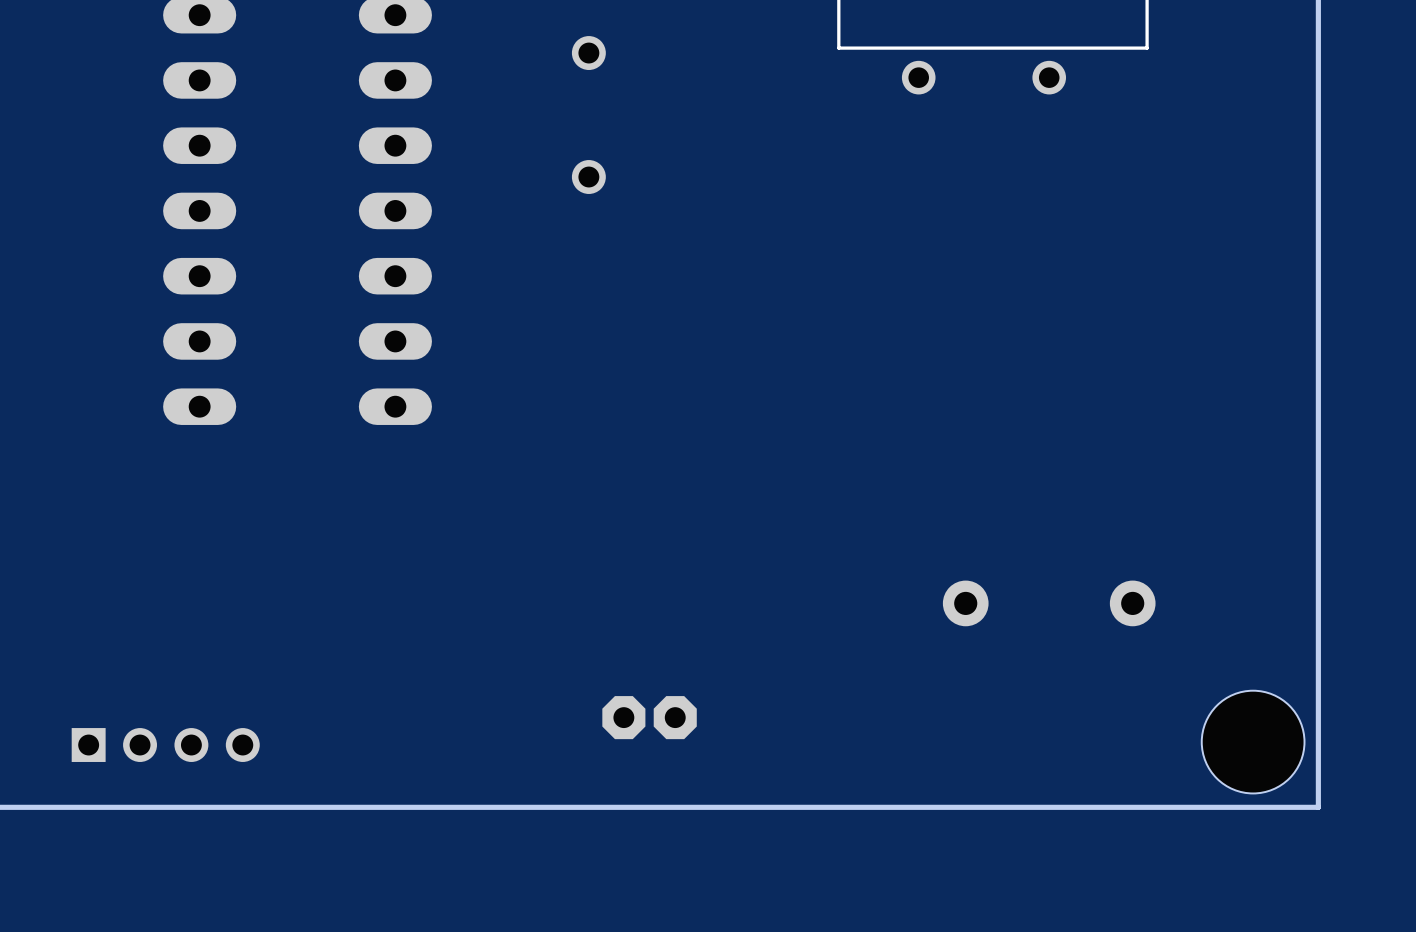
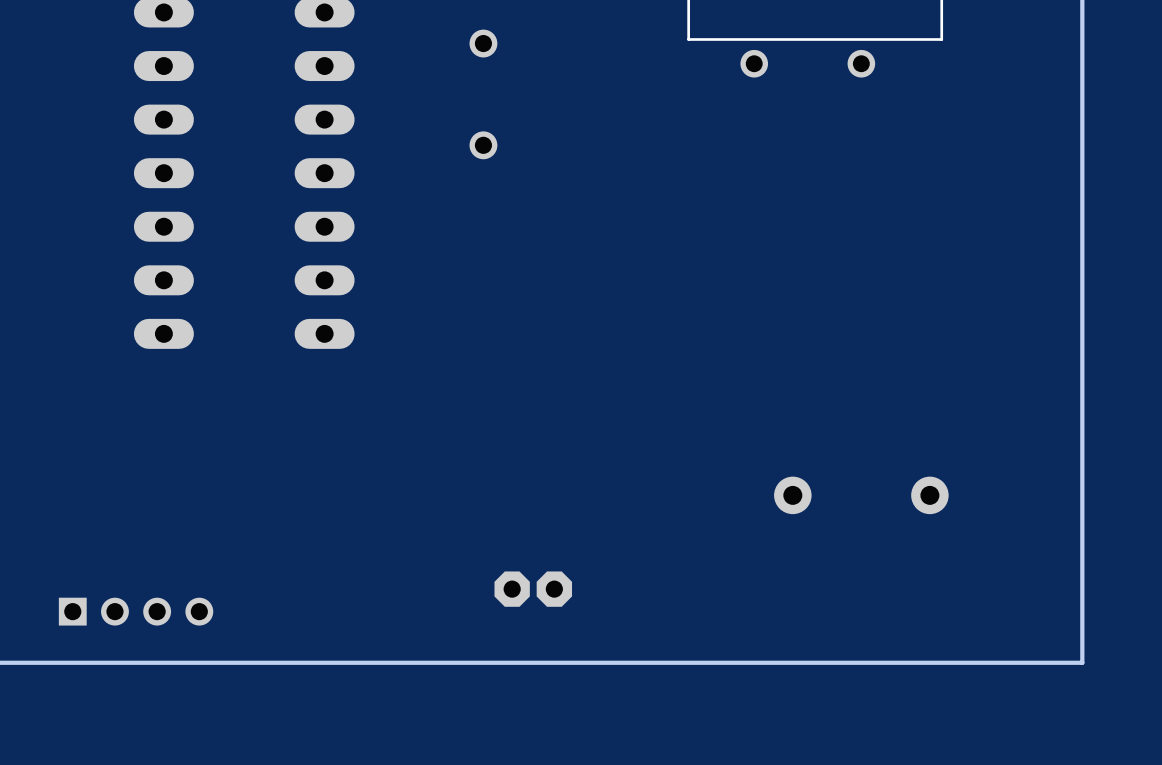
hole: (1253, 742) -> none

